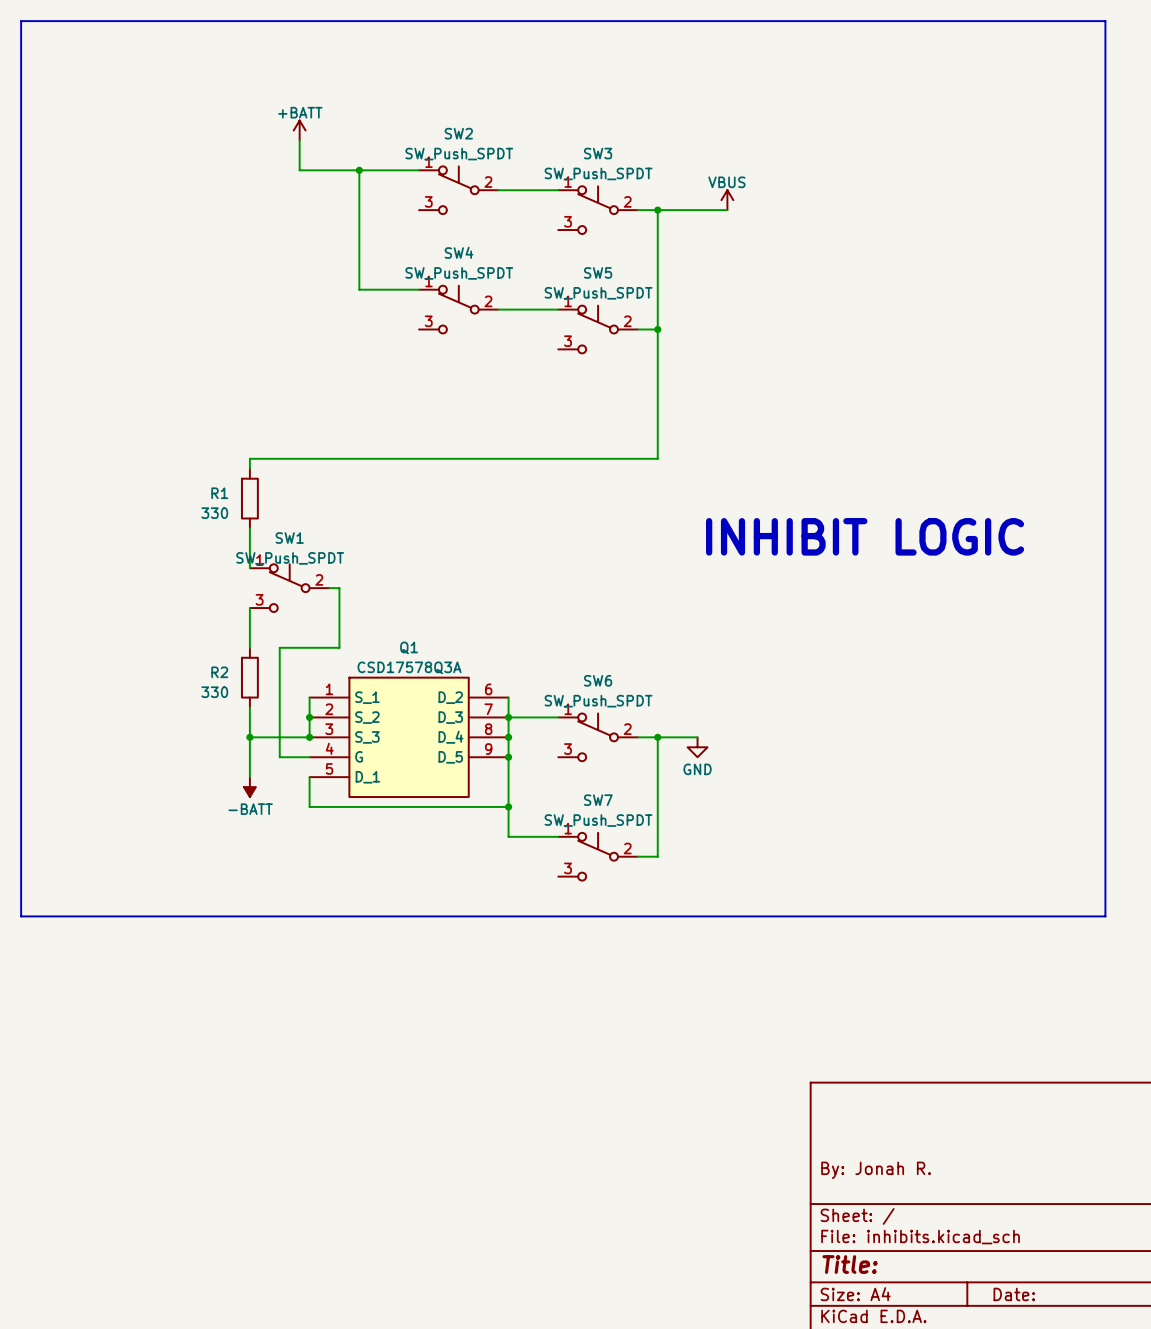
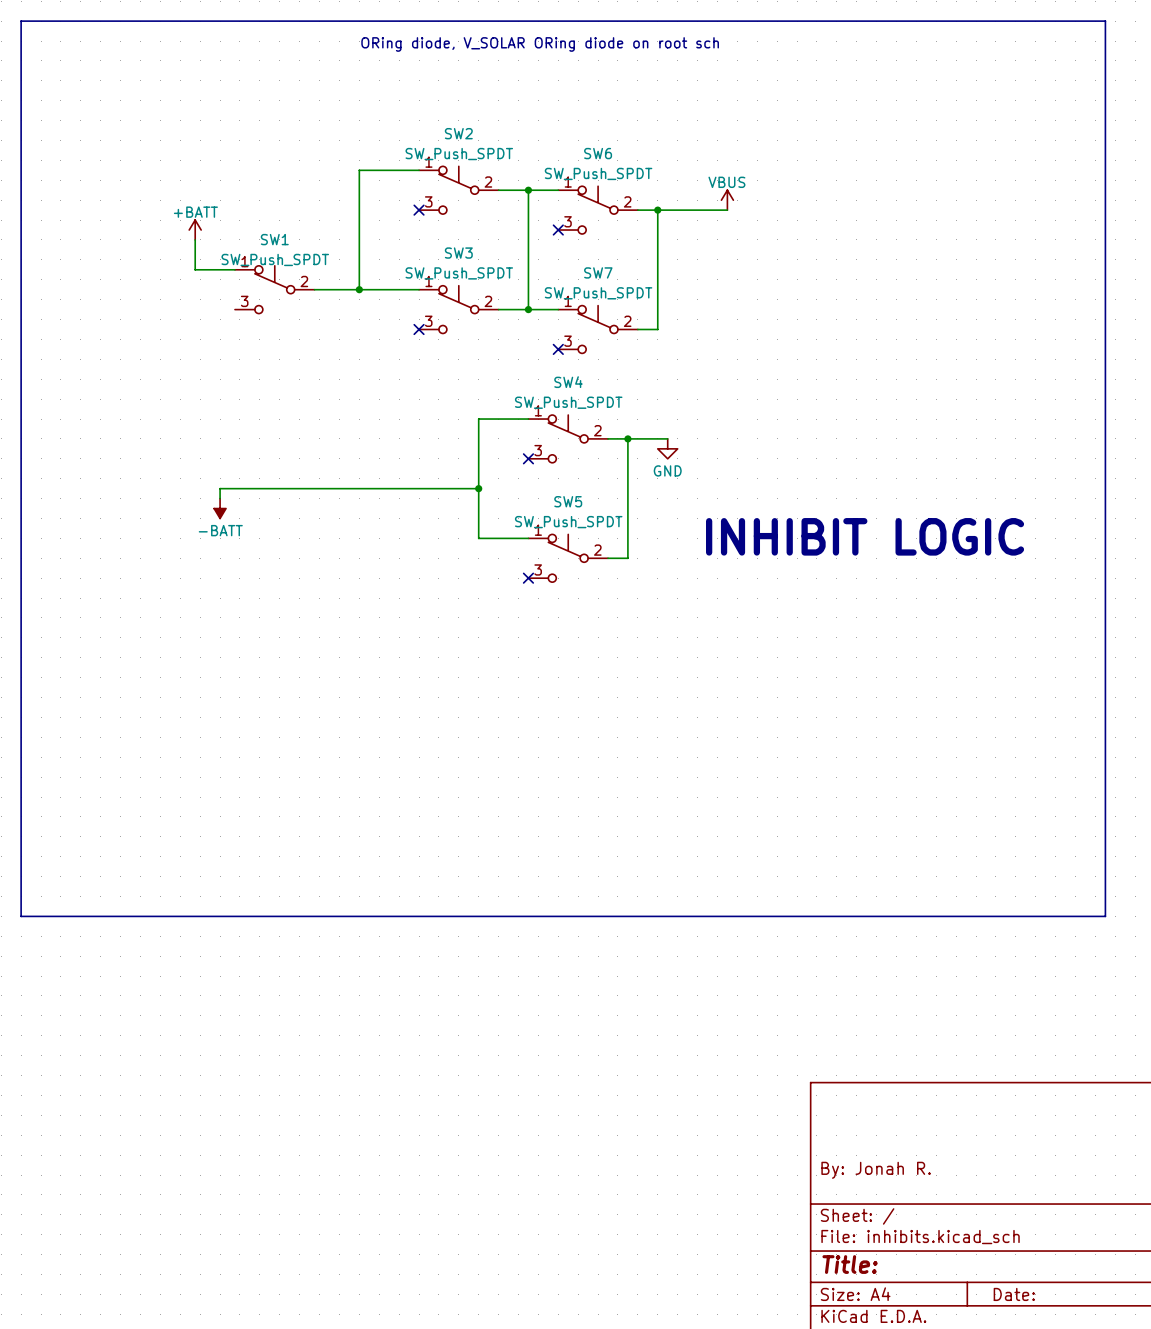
text: none -> ORing diode, V_SOLAR ORing diode on root sch (540, 44)
power symbol position: +BATT (299, 130) -> +BATT (195, 230)
wire: (299, 140) (299, 170) (359, 170) -> none
SW3 name: SW3 (598, 153) -> SW6 (598, 153)
junction: (359, 170) -> none
wire: none -> (528, 190) (528, 309)
junction: none -> (528, 190)
no-connect mark: none -> (419, 210)
no-connect mark: none -> (558, 230)
wire: none -> (195, 239) (195, 269) (234, 269)
SW4 name: SW4 (459, 252) -> SW3 (458, 253)
SW5 name: SW5 (598, 272) -> SW7 (598, 272)
wire: none -> (314, 289) (359, 289)
junction: none -> (359, 289)
junction: none -> (528, 309)
no-connect mark: none -> (419, 329)
wire: (657, 329) (657, 458) (249, 458) (249, 468) -> none
junction: (657, 329) -> none
no-connect mark: none -> (558, 349)
wire: none -> (528, 419) (478, 419) (478, 538) (528, 538)
SW4: none -> SW_Push_SPDT (568, 438)
wire: none -> (608, 438) (667, 438)
wire: none -> (627, 438) (627, 558) (608, 558)
junction: none -> (627, 438)
power symbol: none -> GND (667, 448)
no-connect mark: none -> (528, 458)
wire: none -> (478, 488) (220, 488) (220, 498)
junction: none -> (478, 488)
R1: 330 (249, 498) -> none
power symbol: none -> -BATT (220, 508)
wire: (249, 528) (249, 568) -> none
SW5: none -> SW_Push_SPDT (568, 558)
no-connect mark: none -> (528, 578)
SW1 position: (289, 588) -> (274, 289)
wire: (329, 588) (339, 588) (339, 647) (279, 647) (279, 757) (309, 757) -> none
wire: (249, 608) (249, 647) -> none
R2: 330 (249, 677) -> none
wire: (309, 697) (309, 737) (249, 737) -> none
wire: (508, 697) (508, 836) (558, 836) -> none
wire: (249, 707) (249, 777) -> none
junction: (309, 717) -> none
wire: (508, 717) (558, 717) -> none
junction: (508, 717) -> none
junction: (249, 737) -> none
junction: (309, 737) -> none
Q1: CSD17578Q3A (409, 737) -> none
junction: (508, 737) -> none
SW6: SW_Push_SPDT (598, 737) -> none
wire: (637, 737) (697, 737) -> none
wire: (657, 737) (657, 856) (637, 856) -> none
junction: (657, 737) -> none
power symbol: GND (697, 747) -> none
junction: (508, 757) -> none
wire: (309, 777) (309, 806) (508, 806) -> none
power symbol: -BATT (249, 787) -> none
junction: (508, 806) -> none
SW7: SW_Push_SPDT (598, 856) -> none

